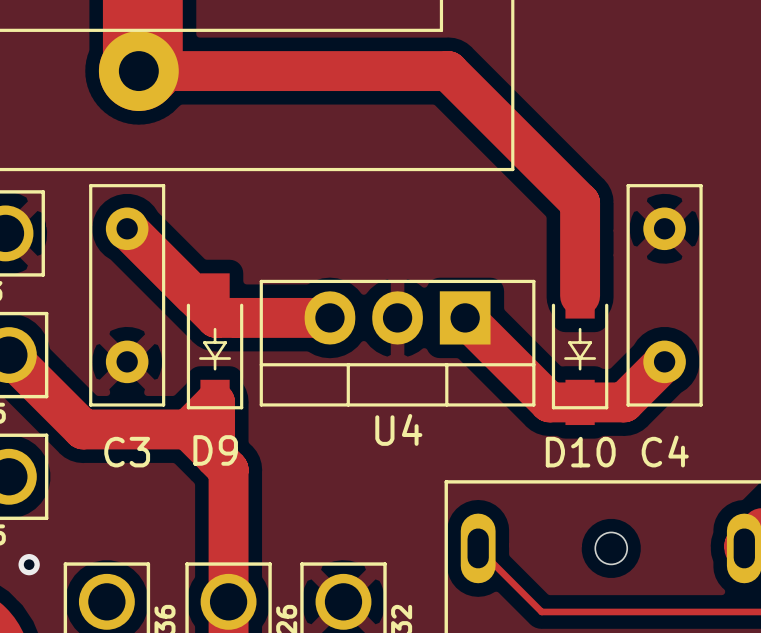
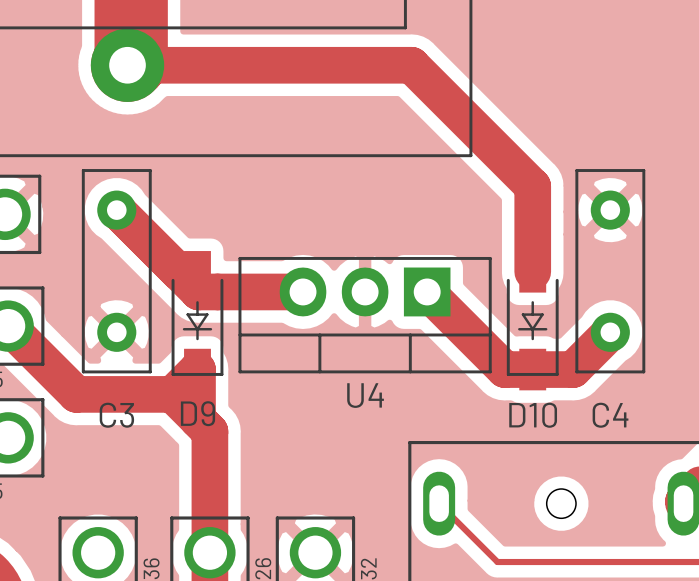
via: (29, 564) -> none

